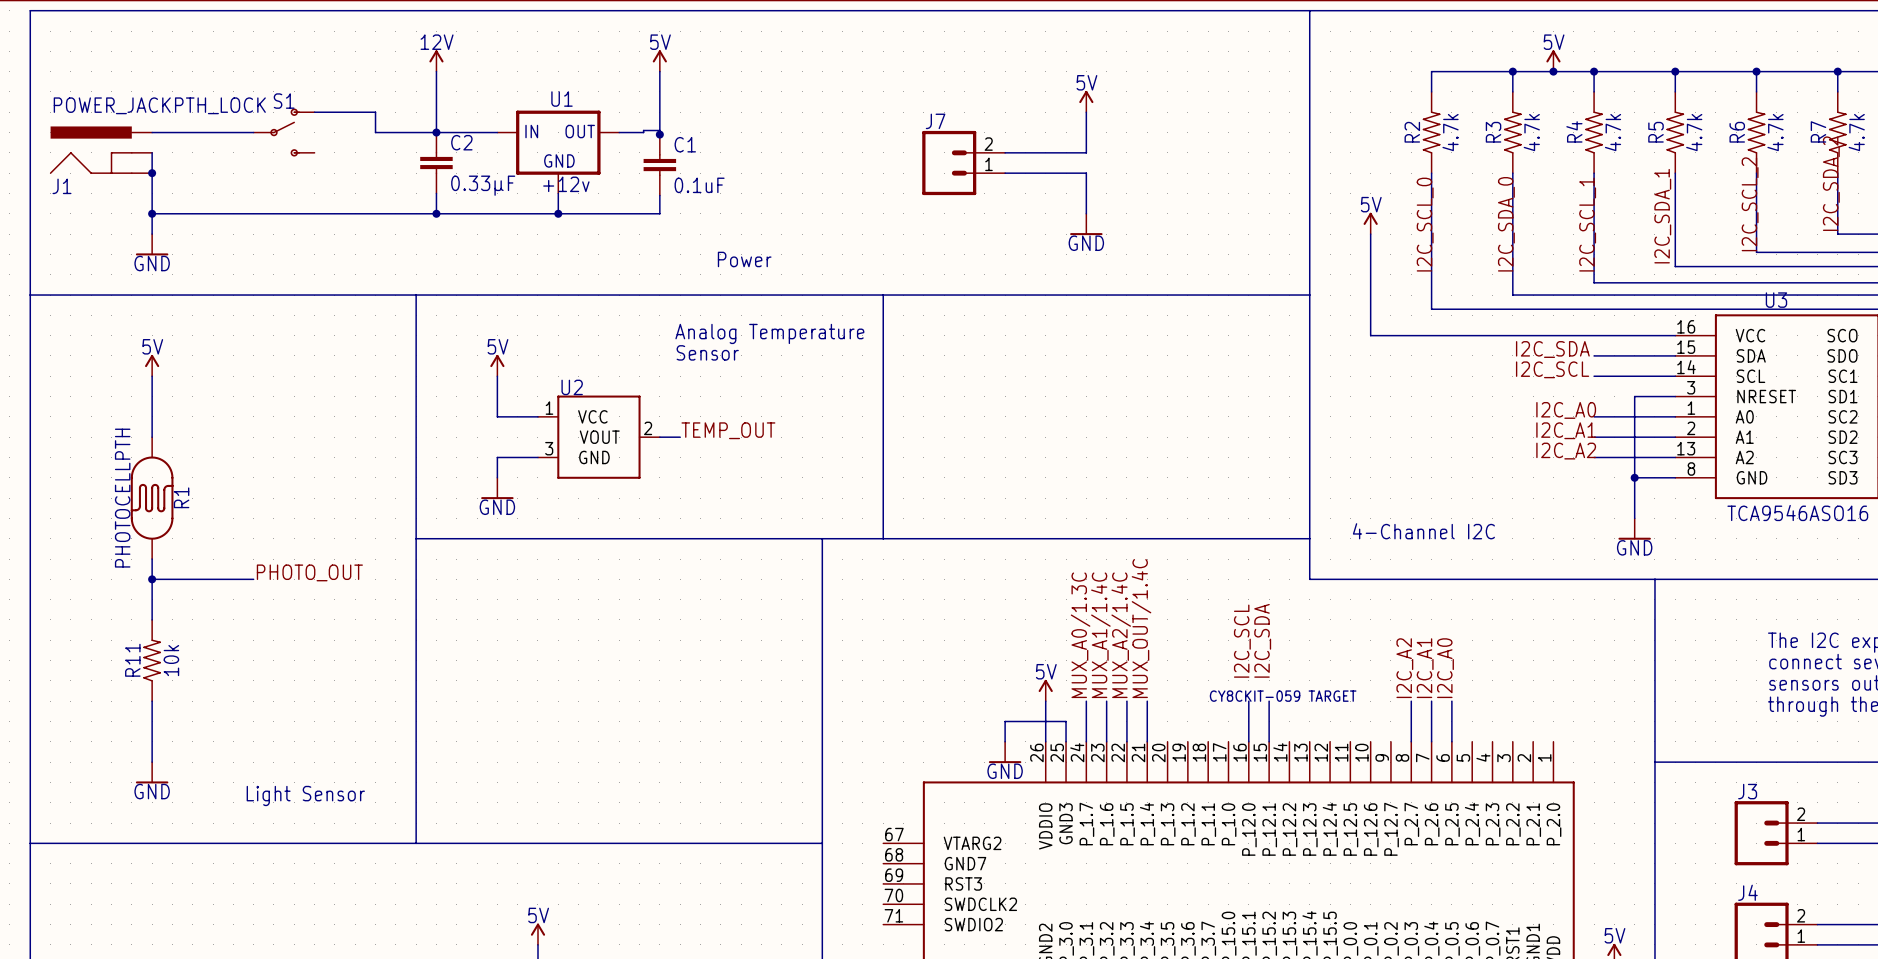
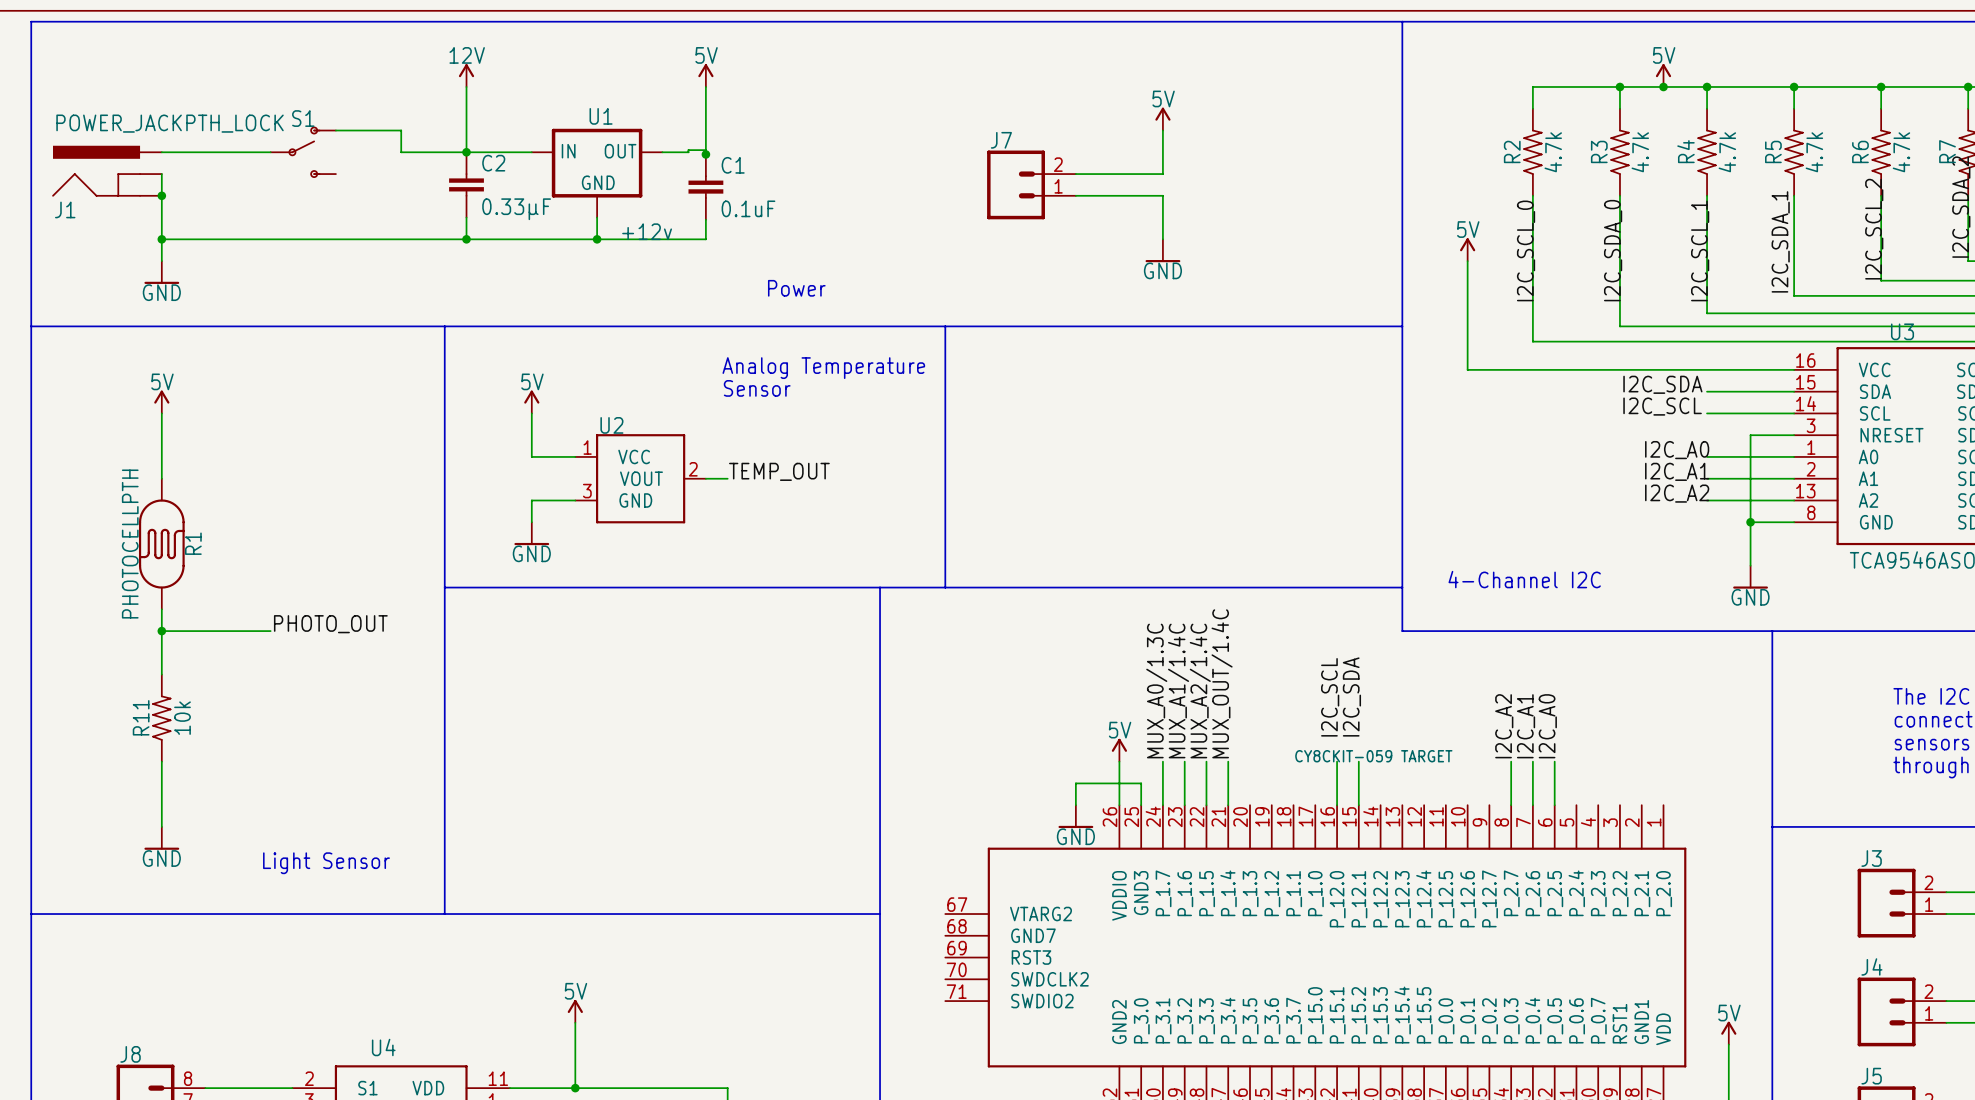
U1 value position: +12v (566, 184) -> +12v (647, 231)

